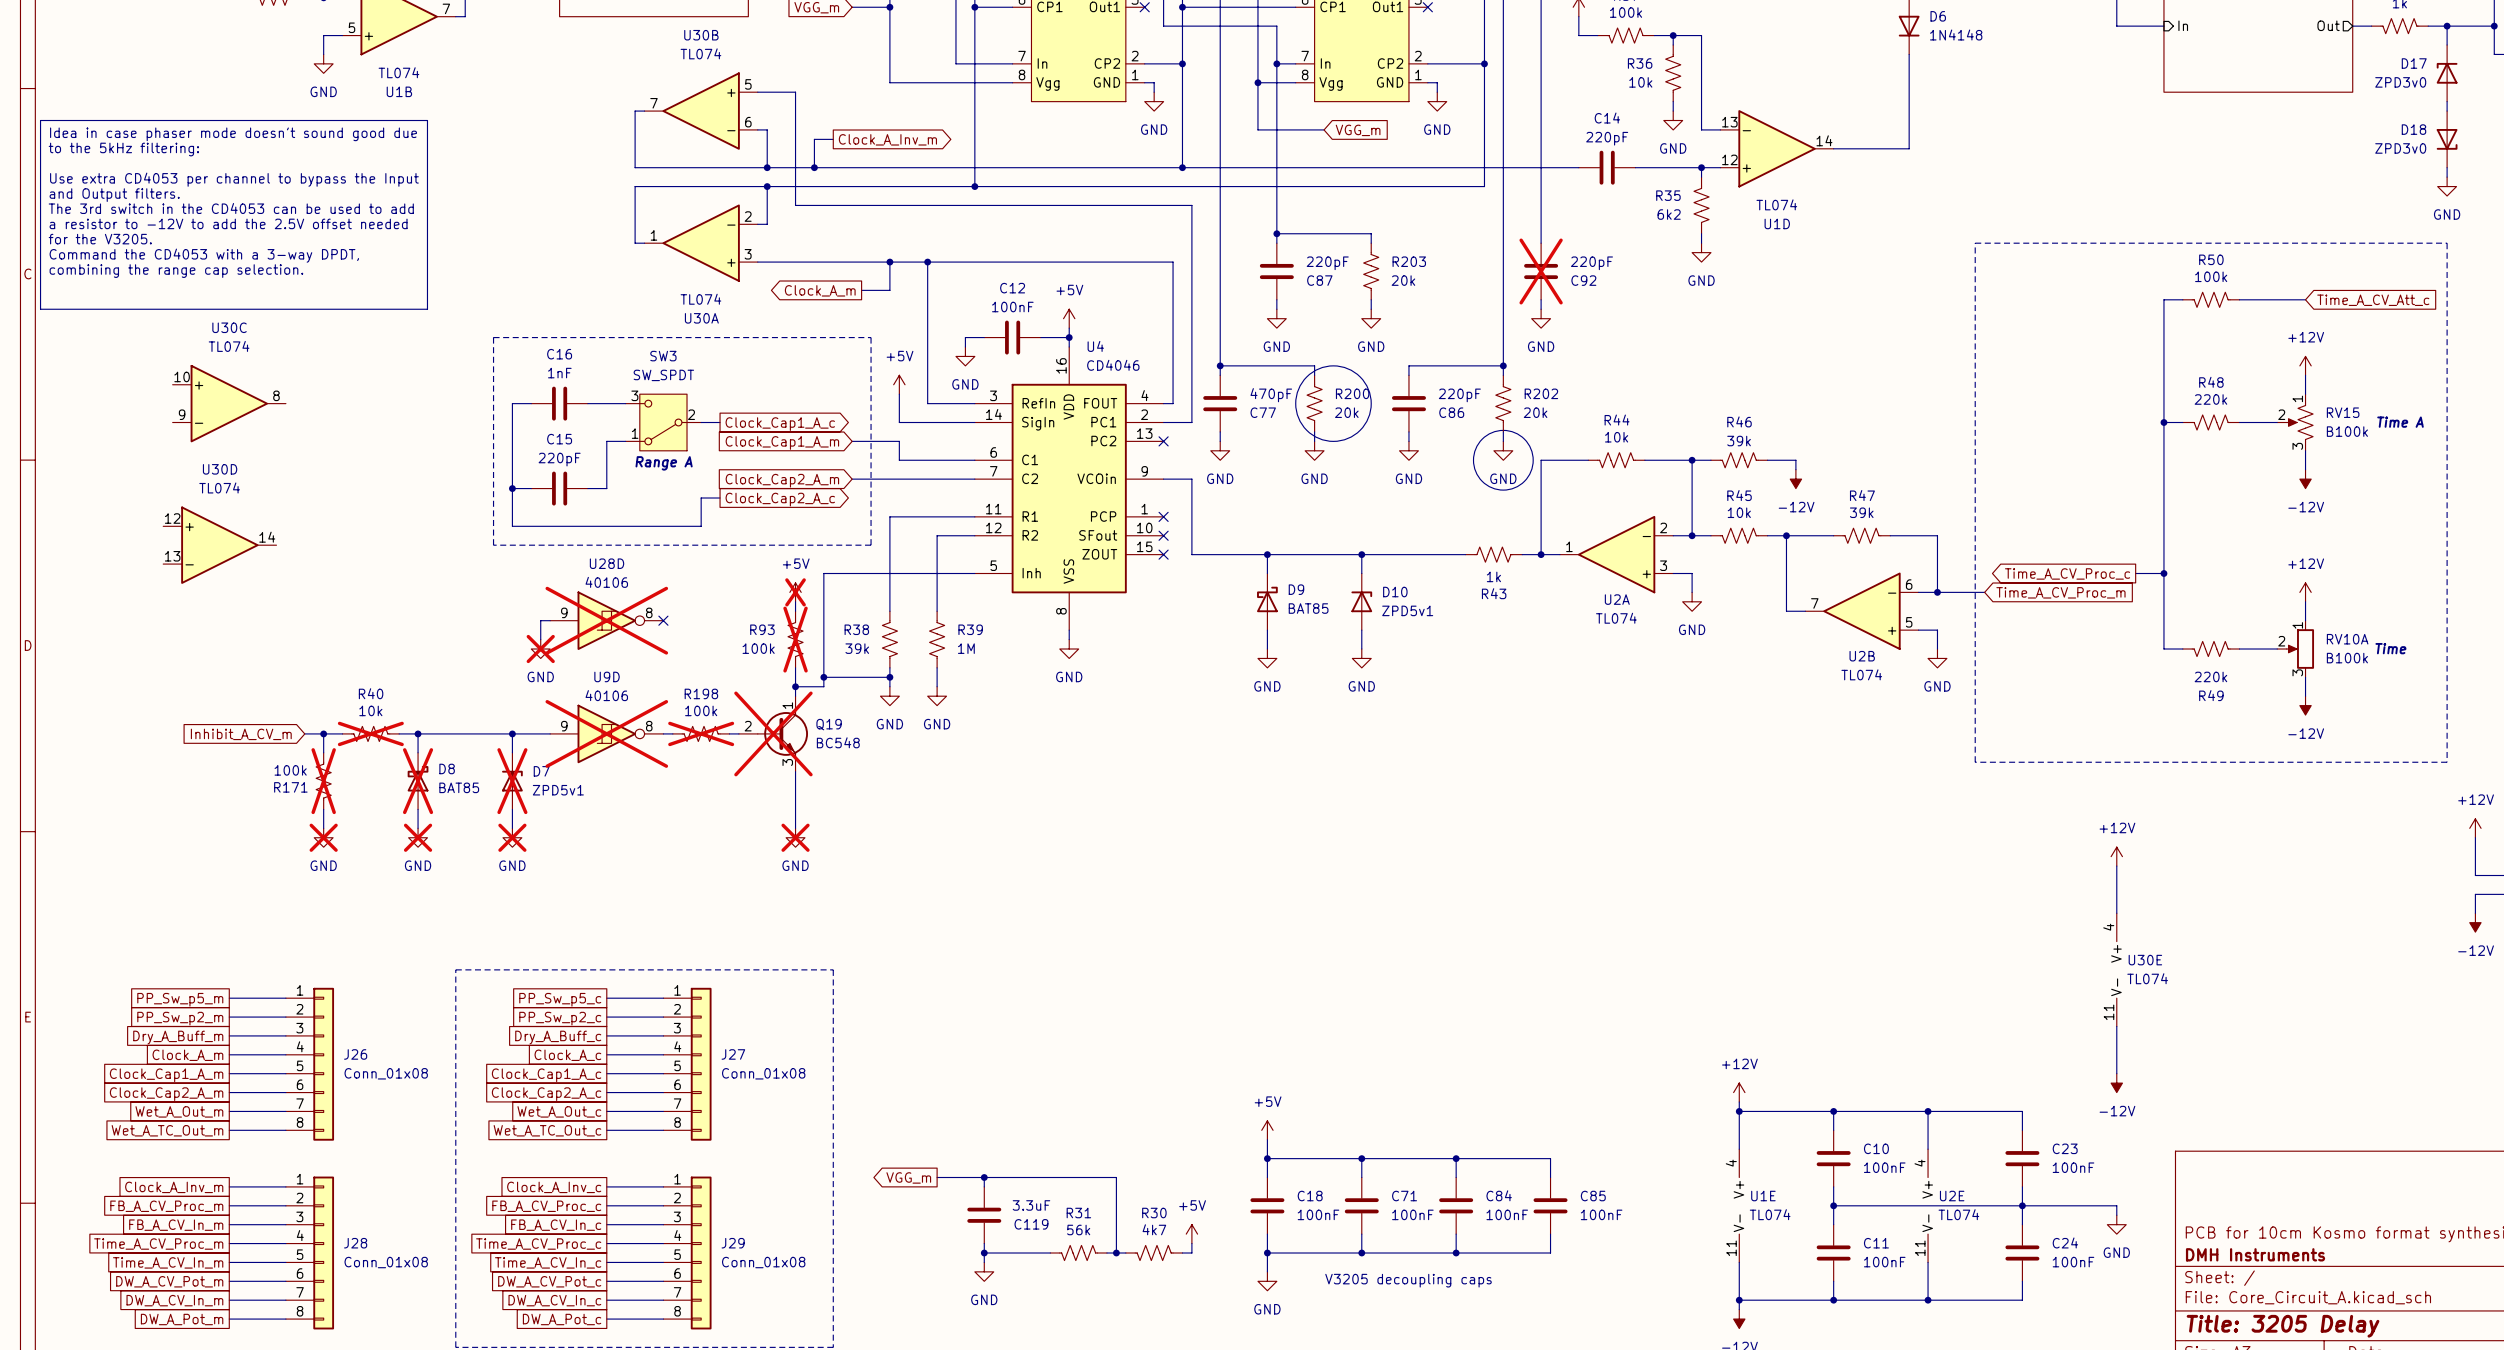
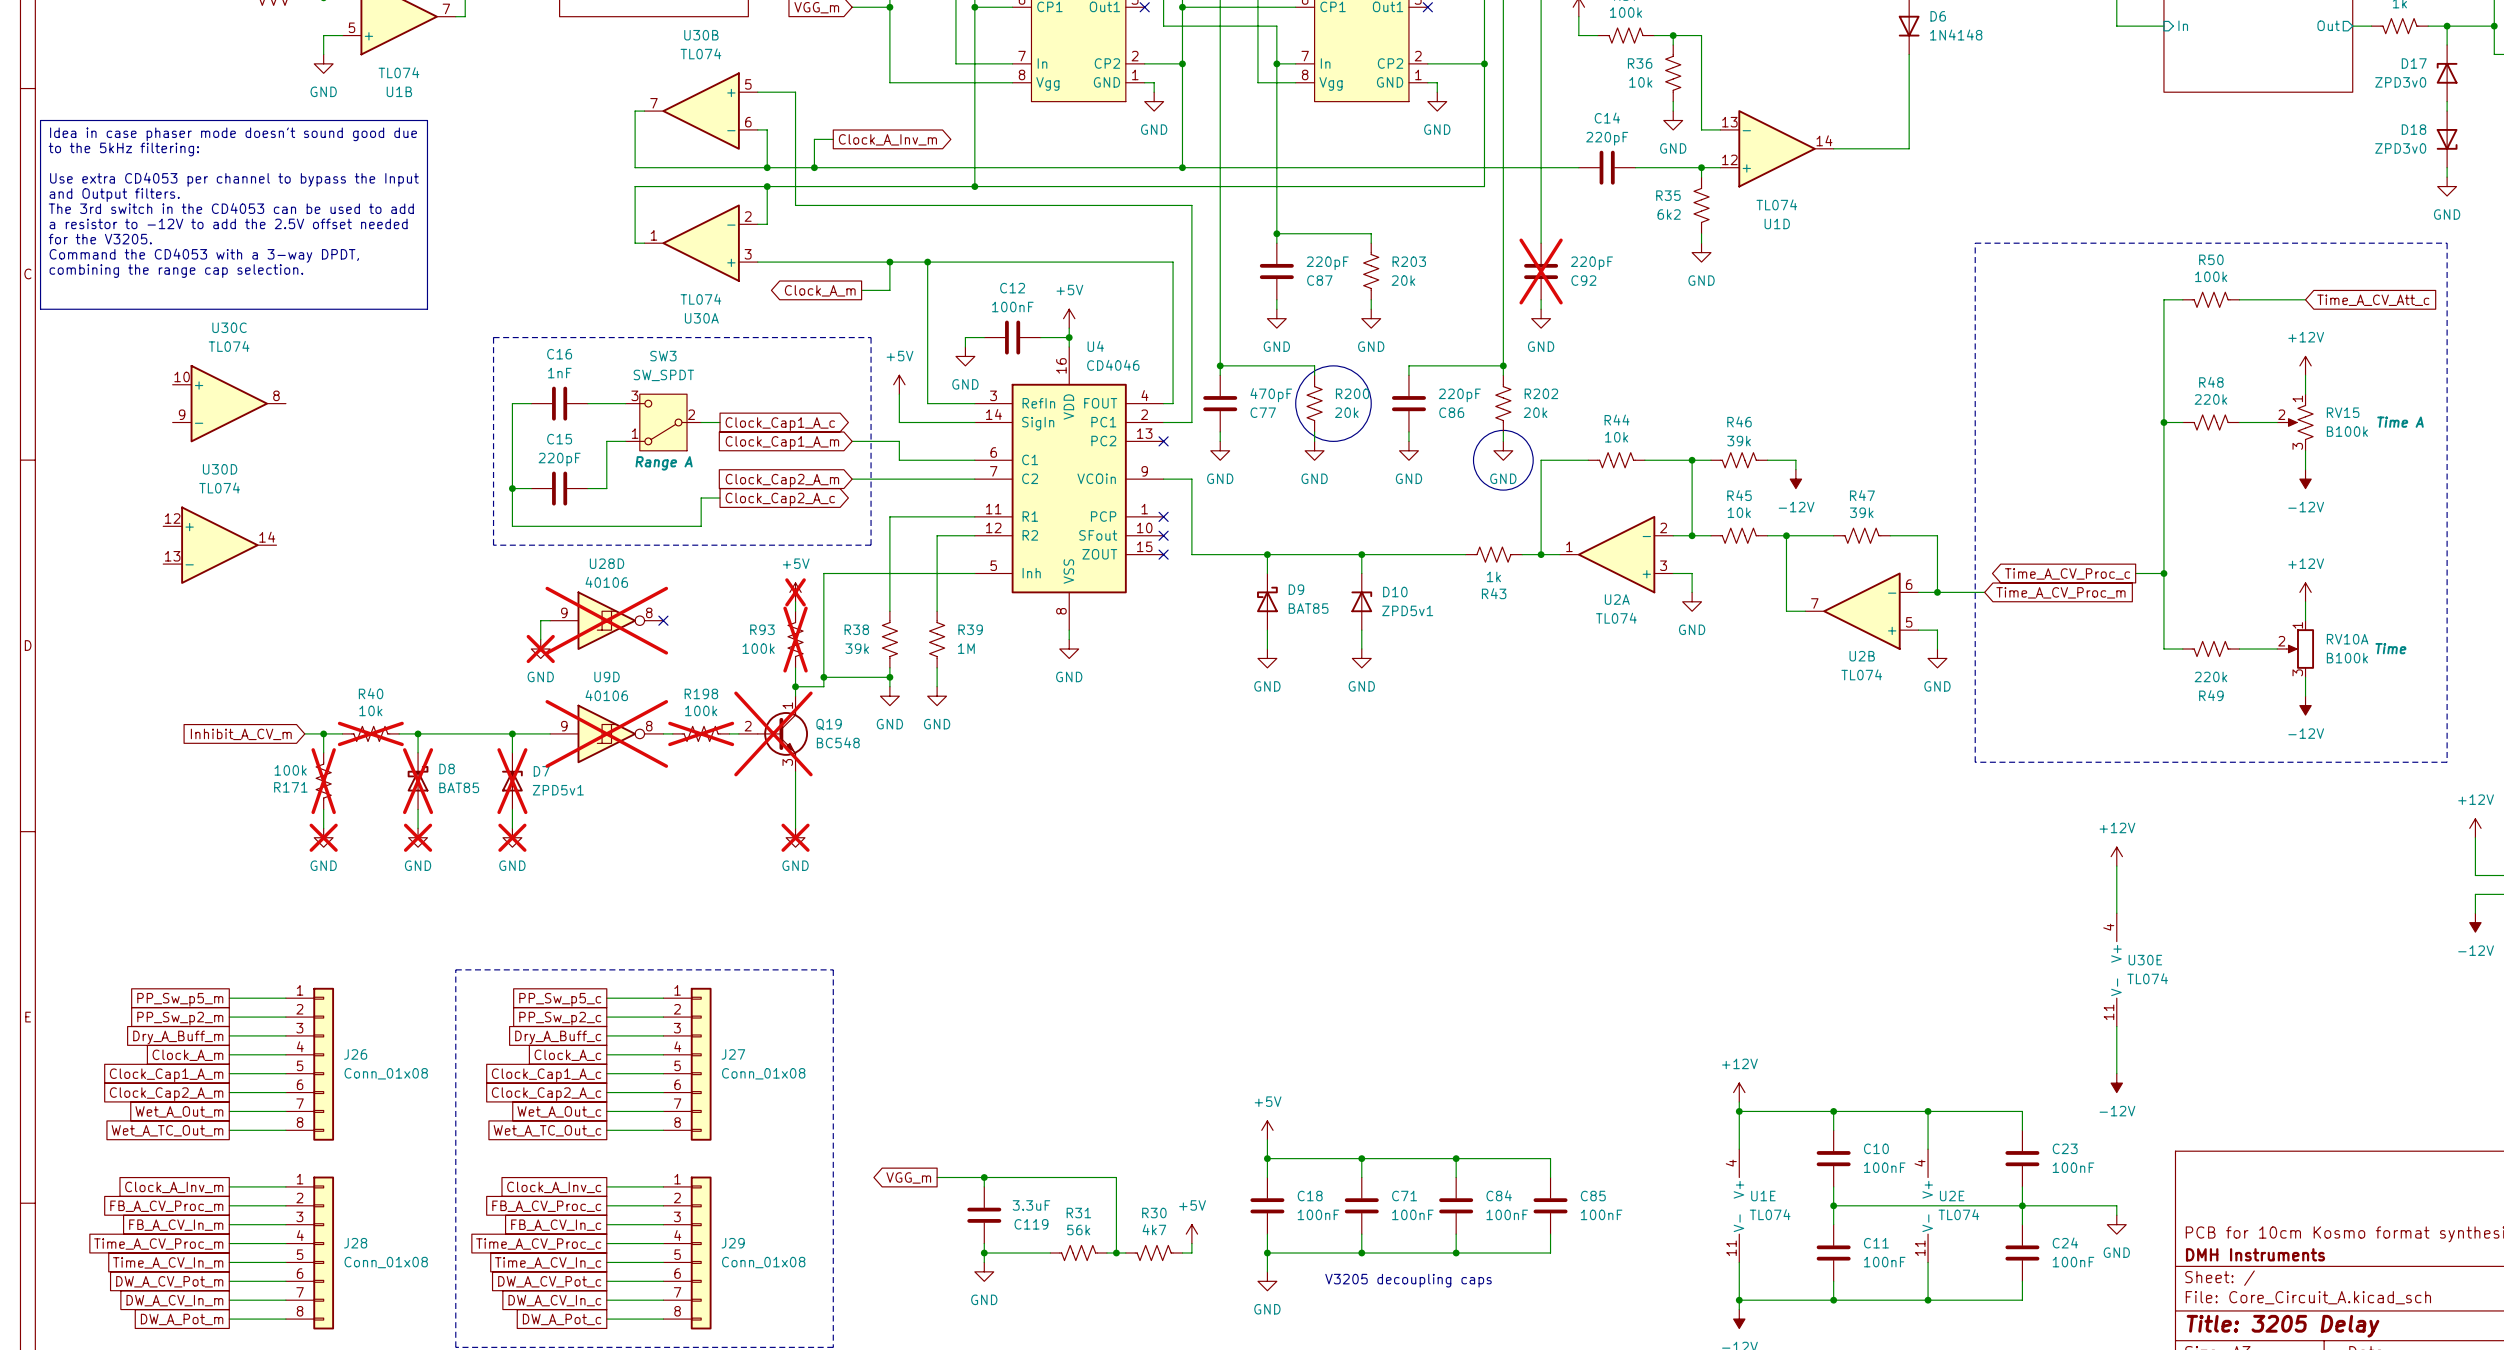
wire: (1257, 82) (1257, 129) (1324, 129) -> none
junction: (1257, 82) -> none
global label: VGG_m (1358, 130) -> none

